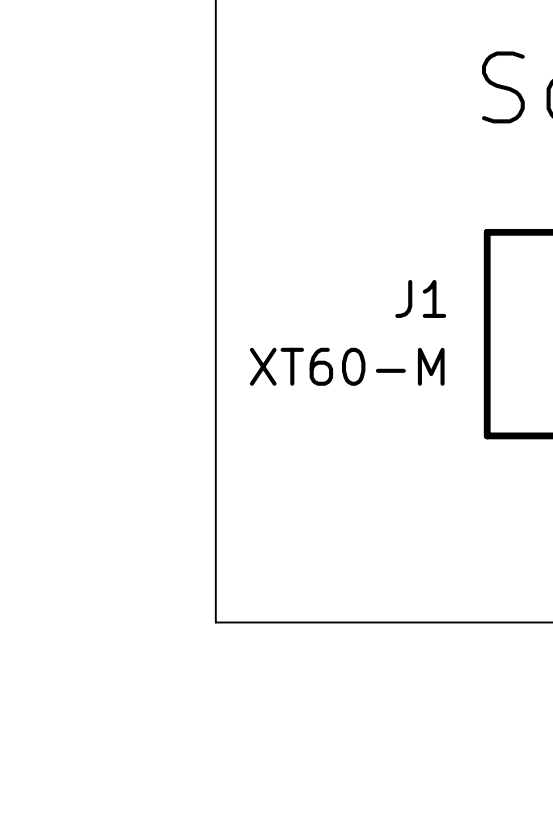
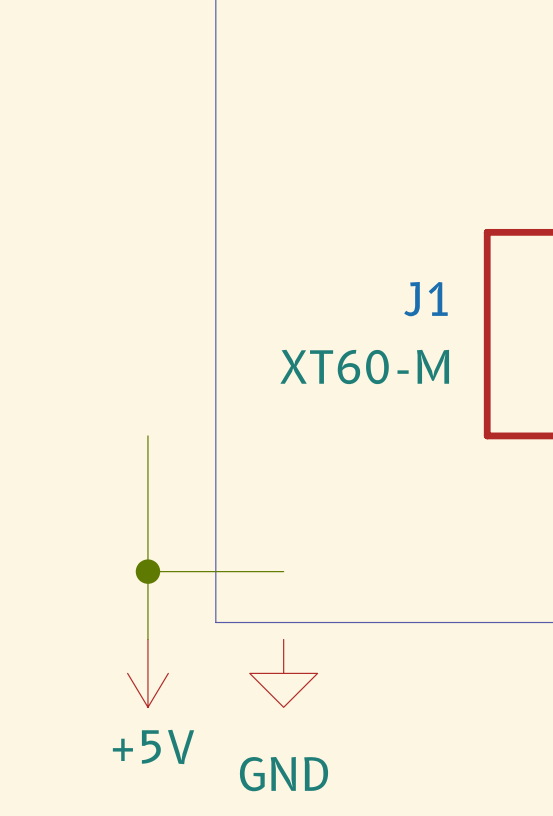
wire: none -> (147, 435) (147, 639)
wire: none -> (147, 571) (283, 571)
junction: none -> (147, 571)
power symbol: none -> +5V (147, 673)
power symbol: none -> GND (283, 673)

